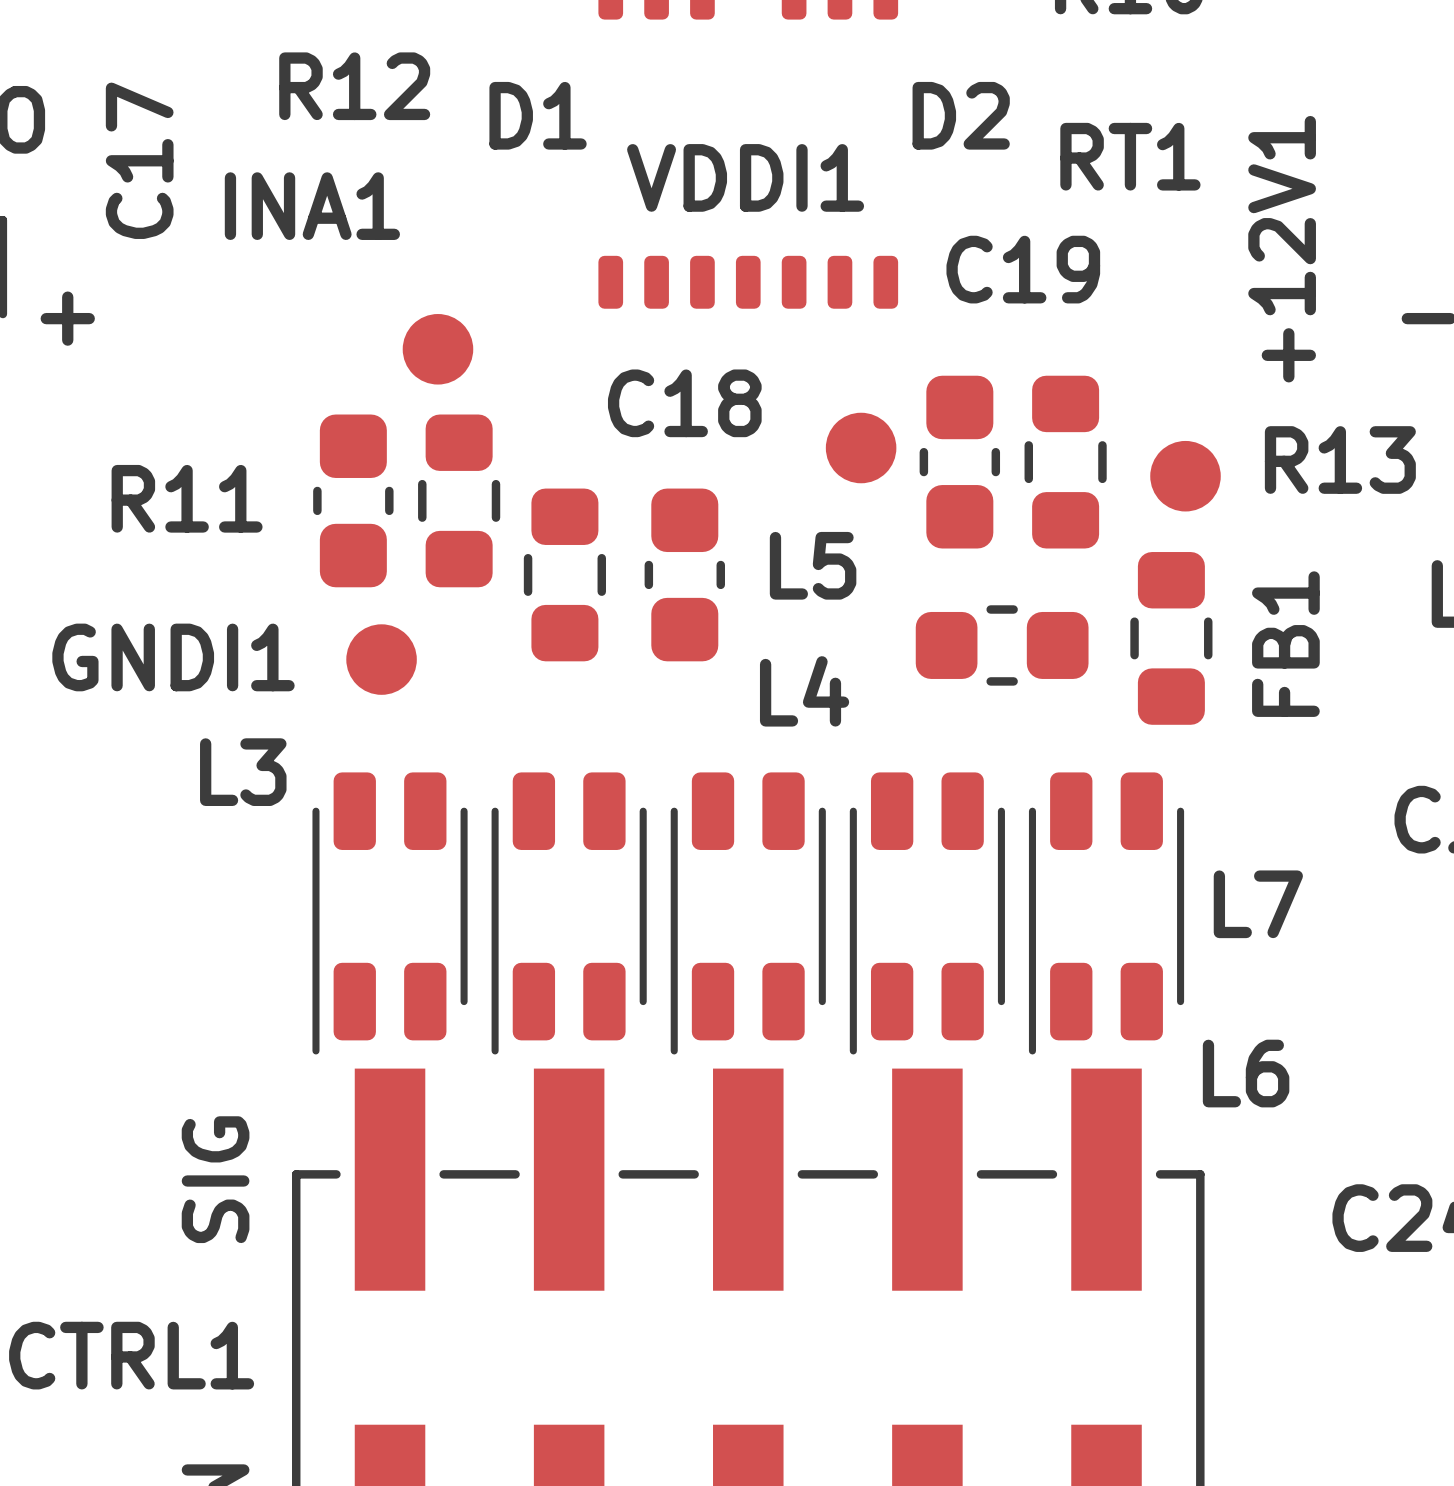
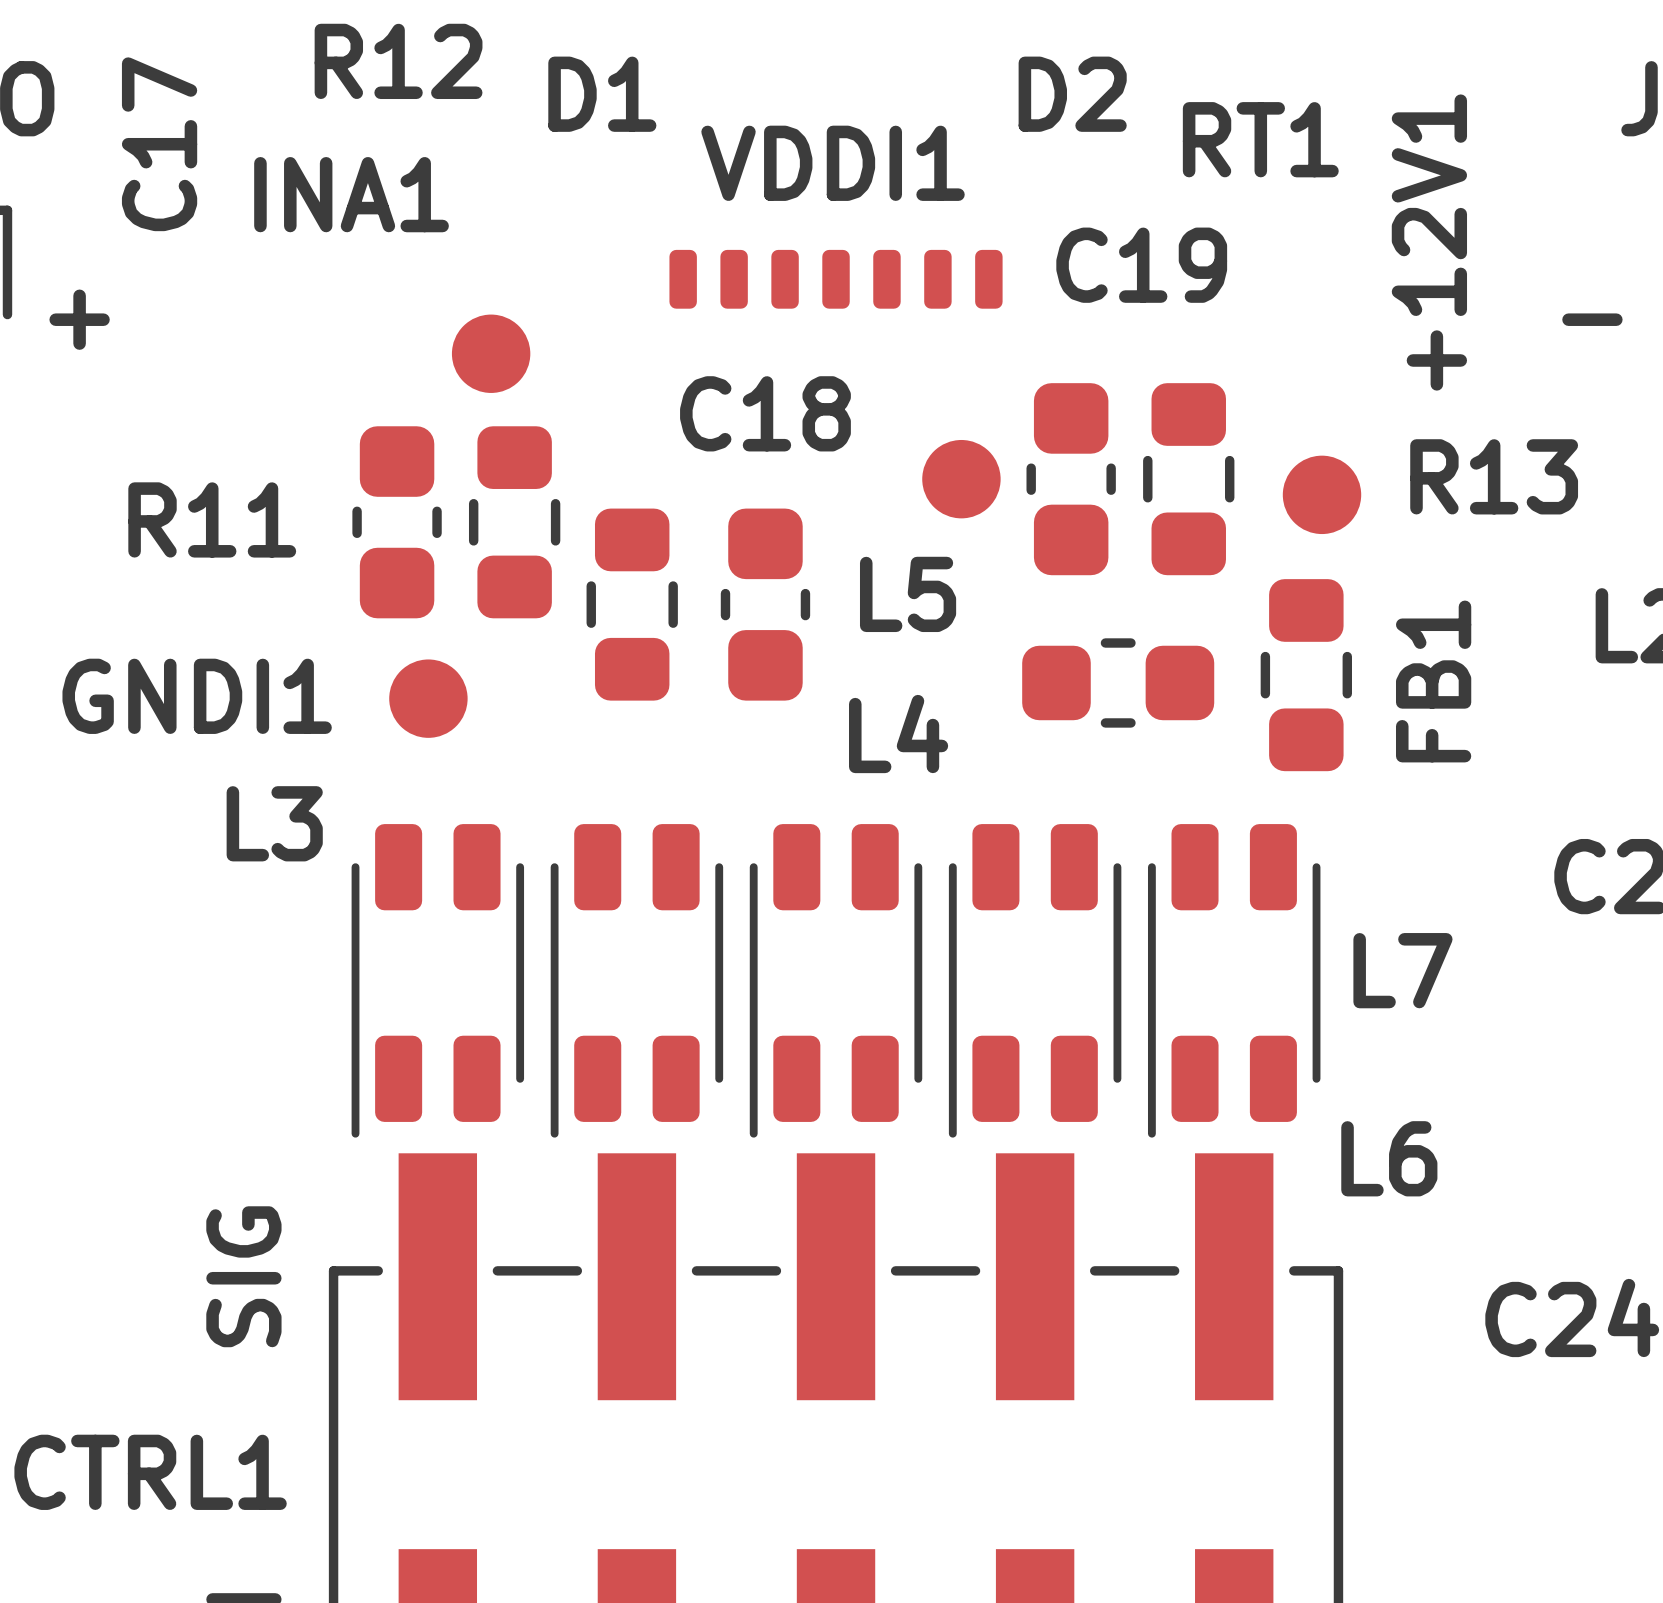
part position: (861, 448) -> (961, 479)

